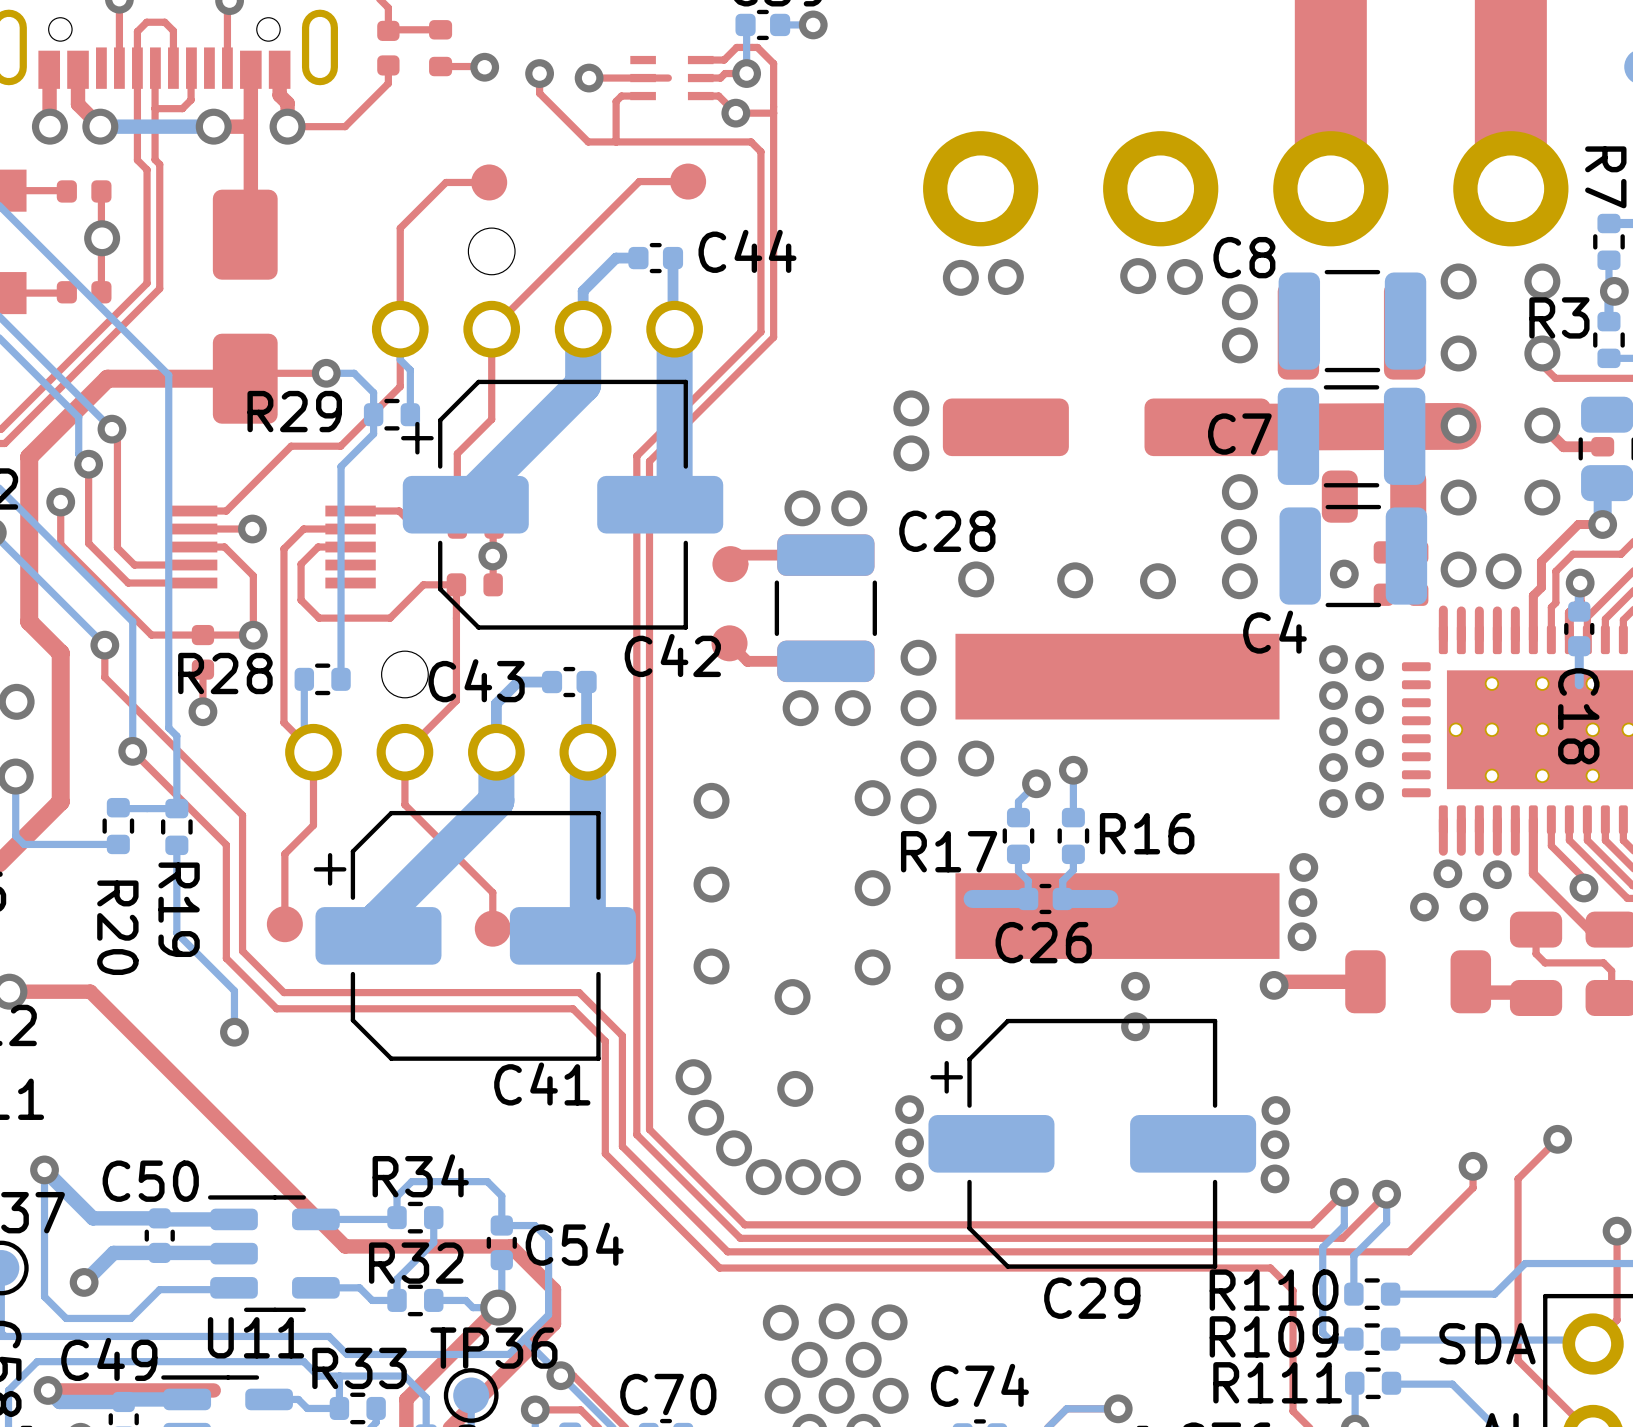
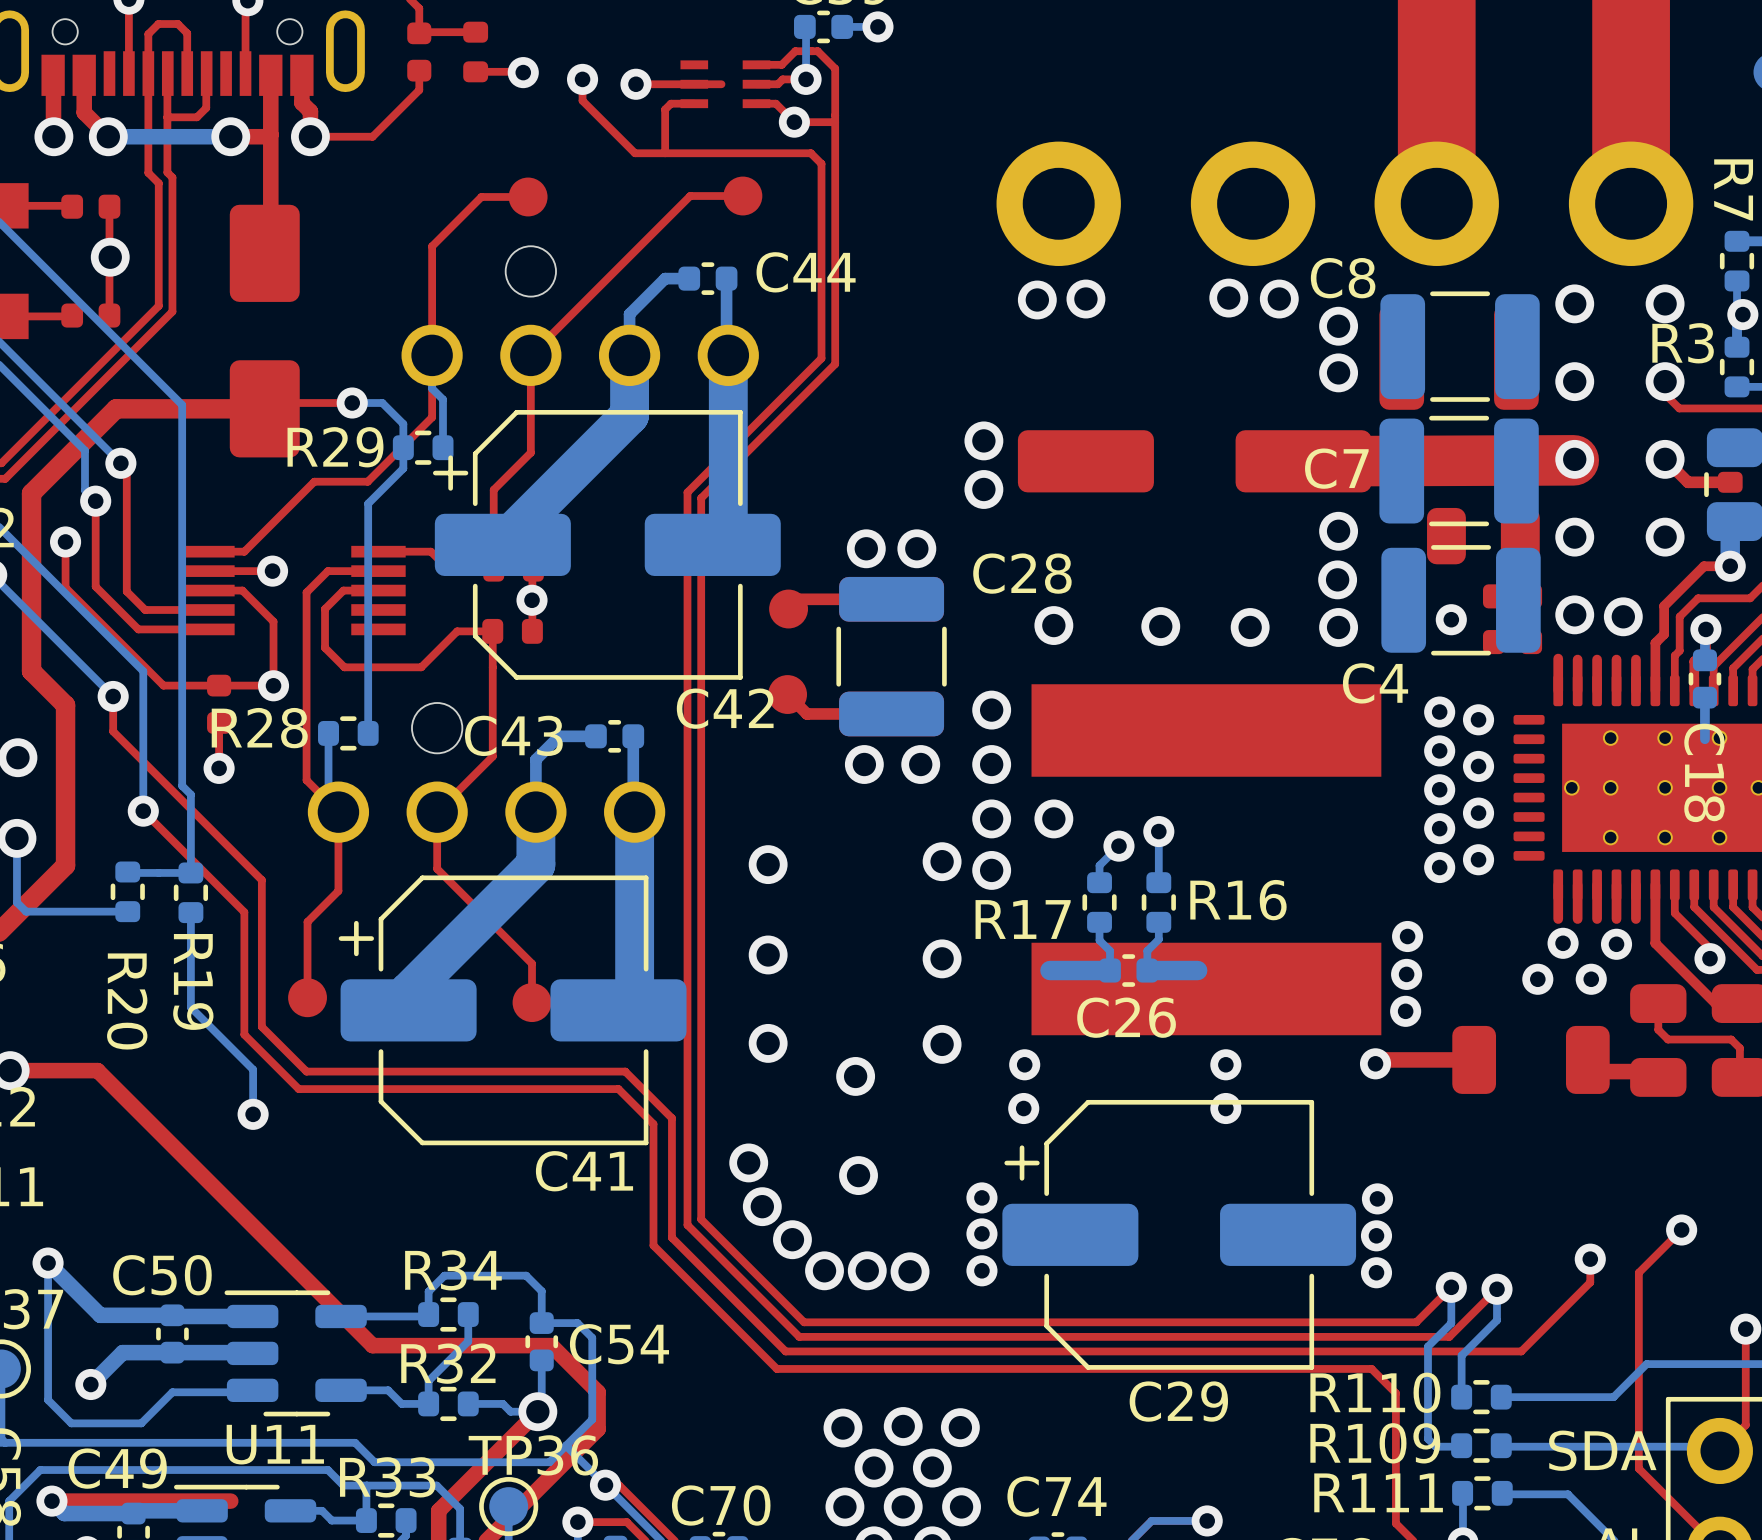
R29 name position: R29 (294, 411) -> R29 (335, 447)
R28 name position: R28 (225, 673) -> R28 (259, 728)

